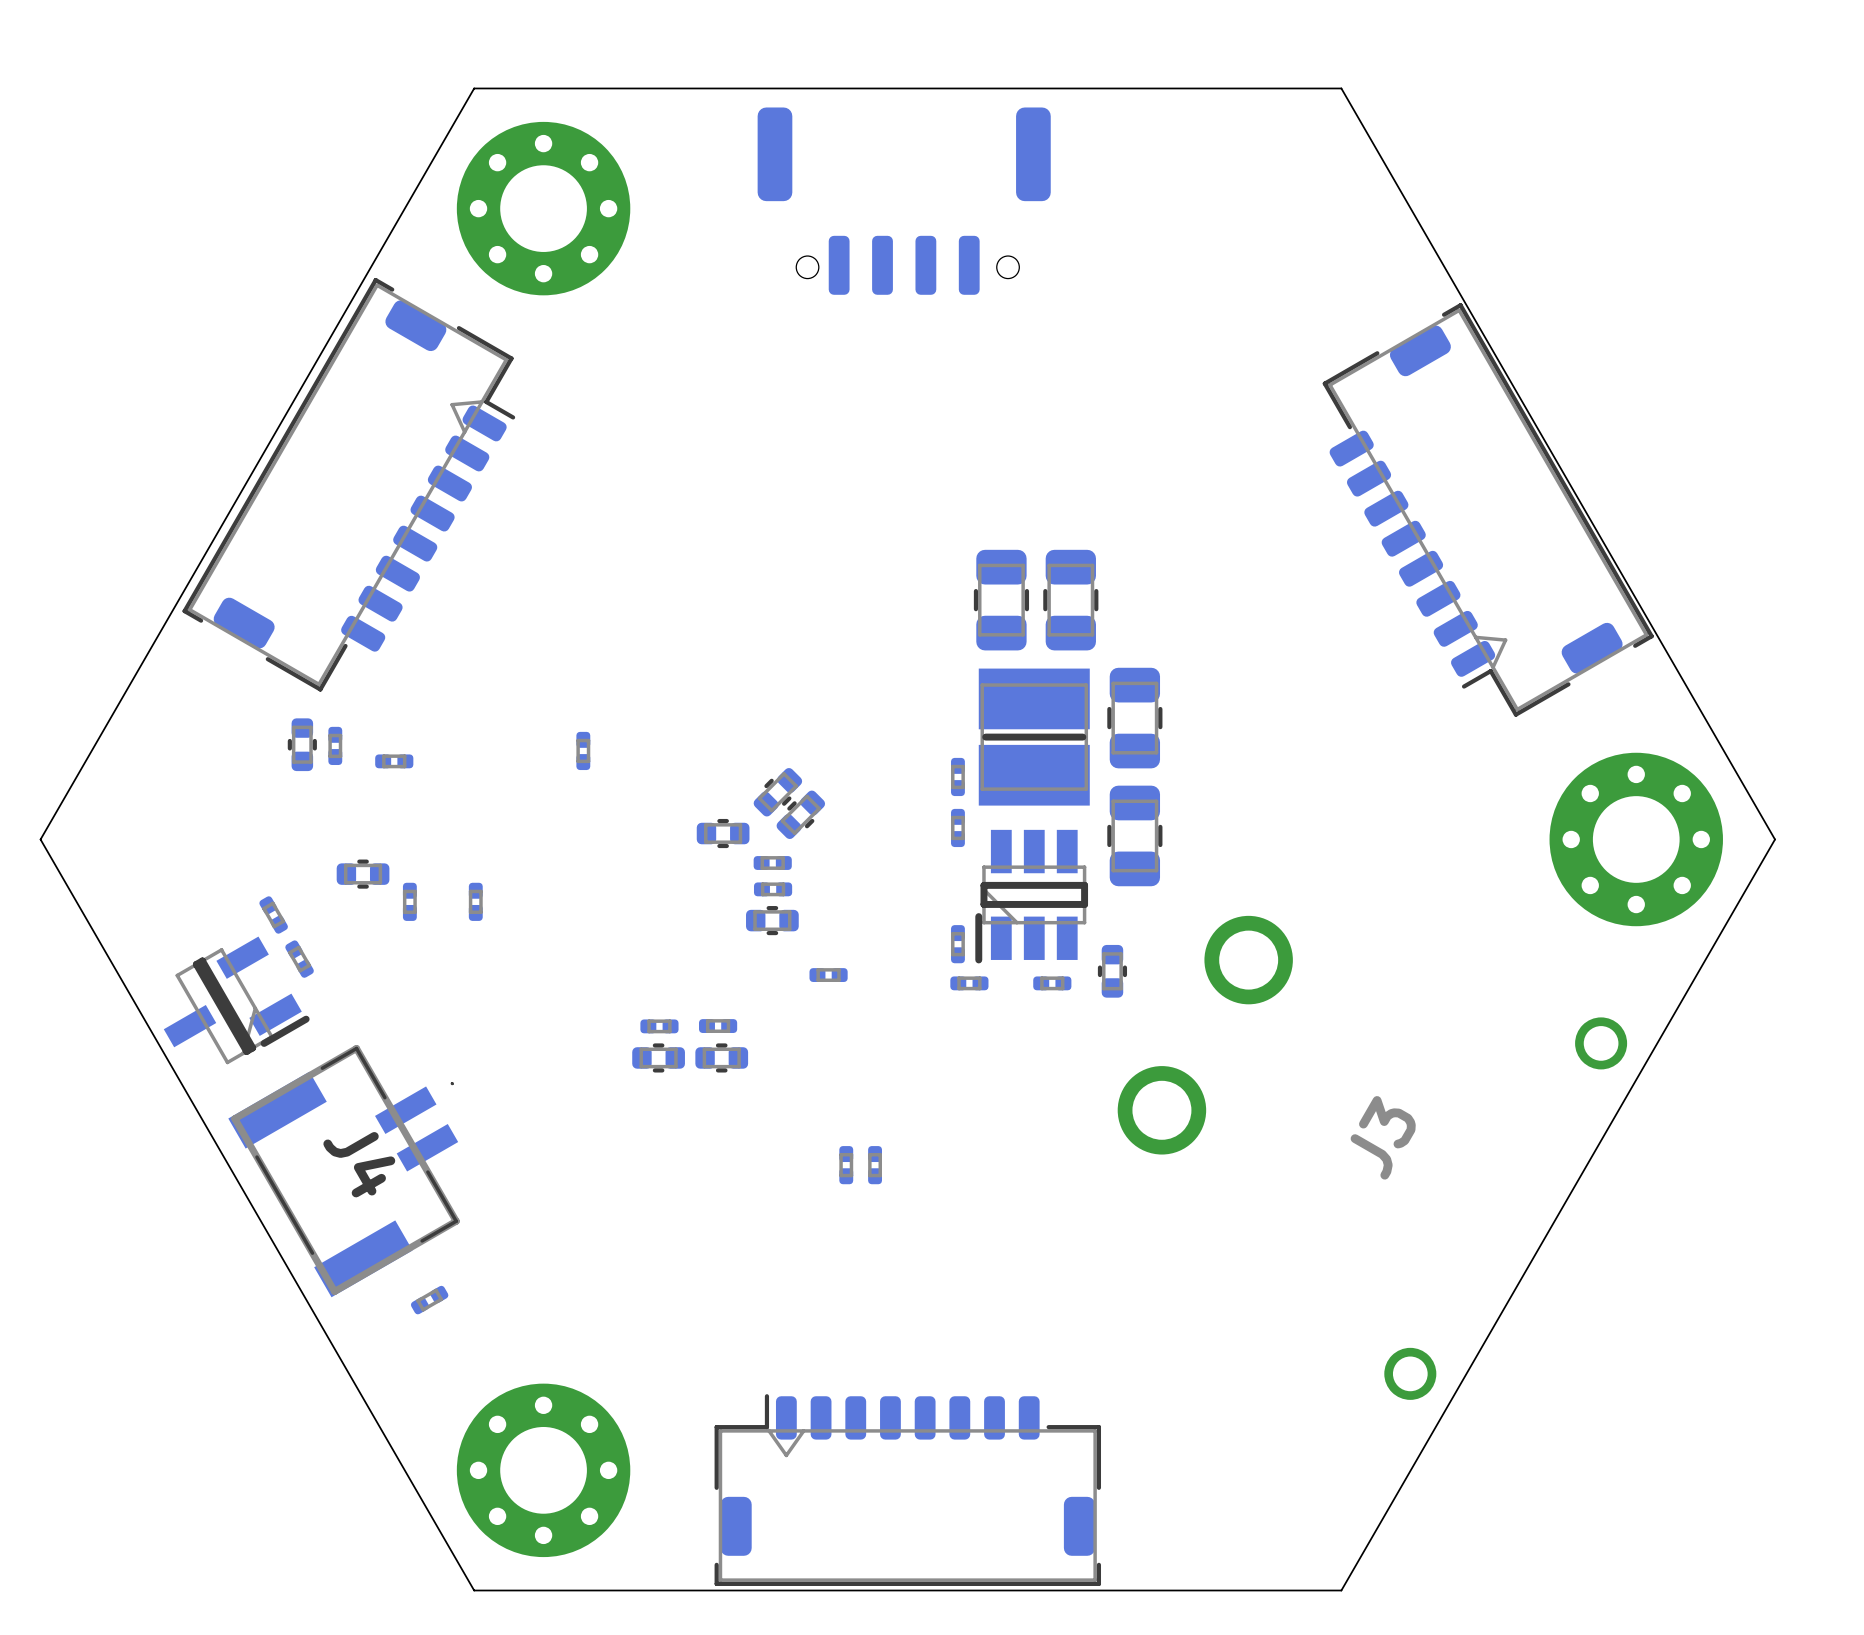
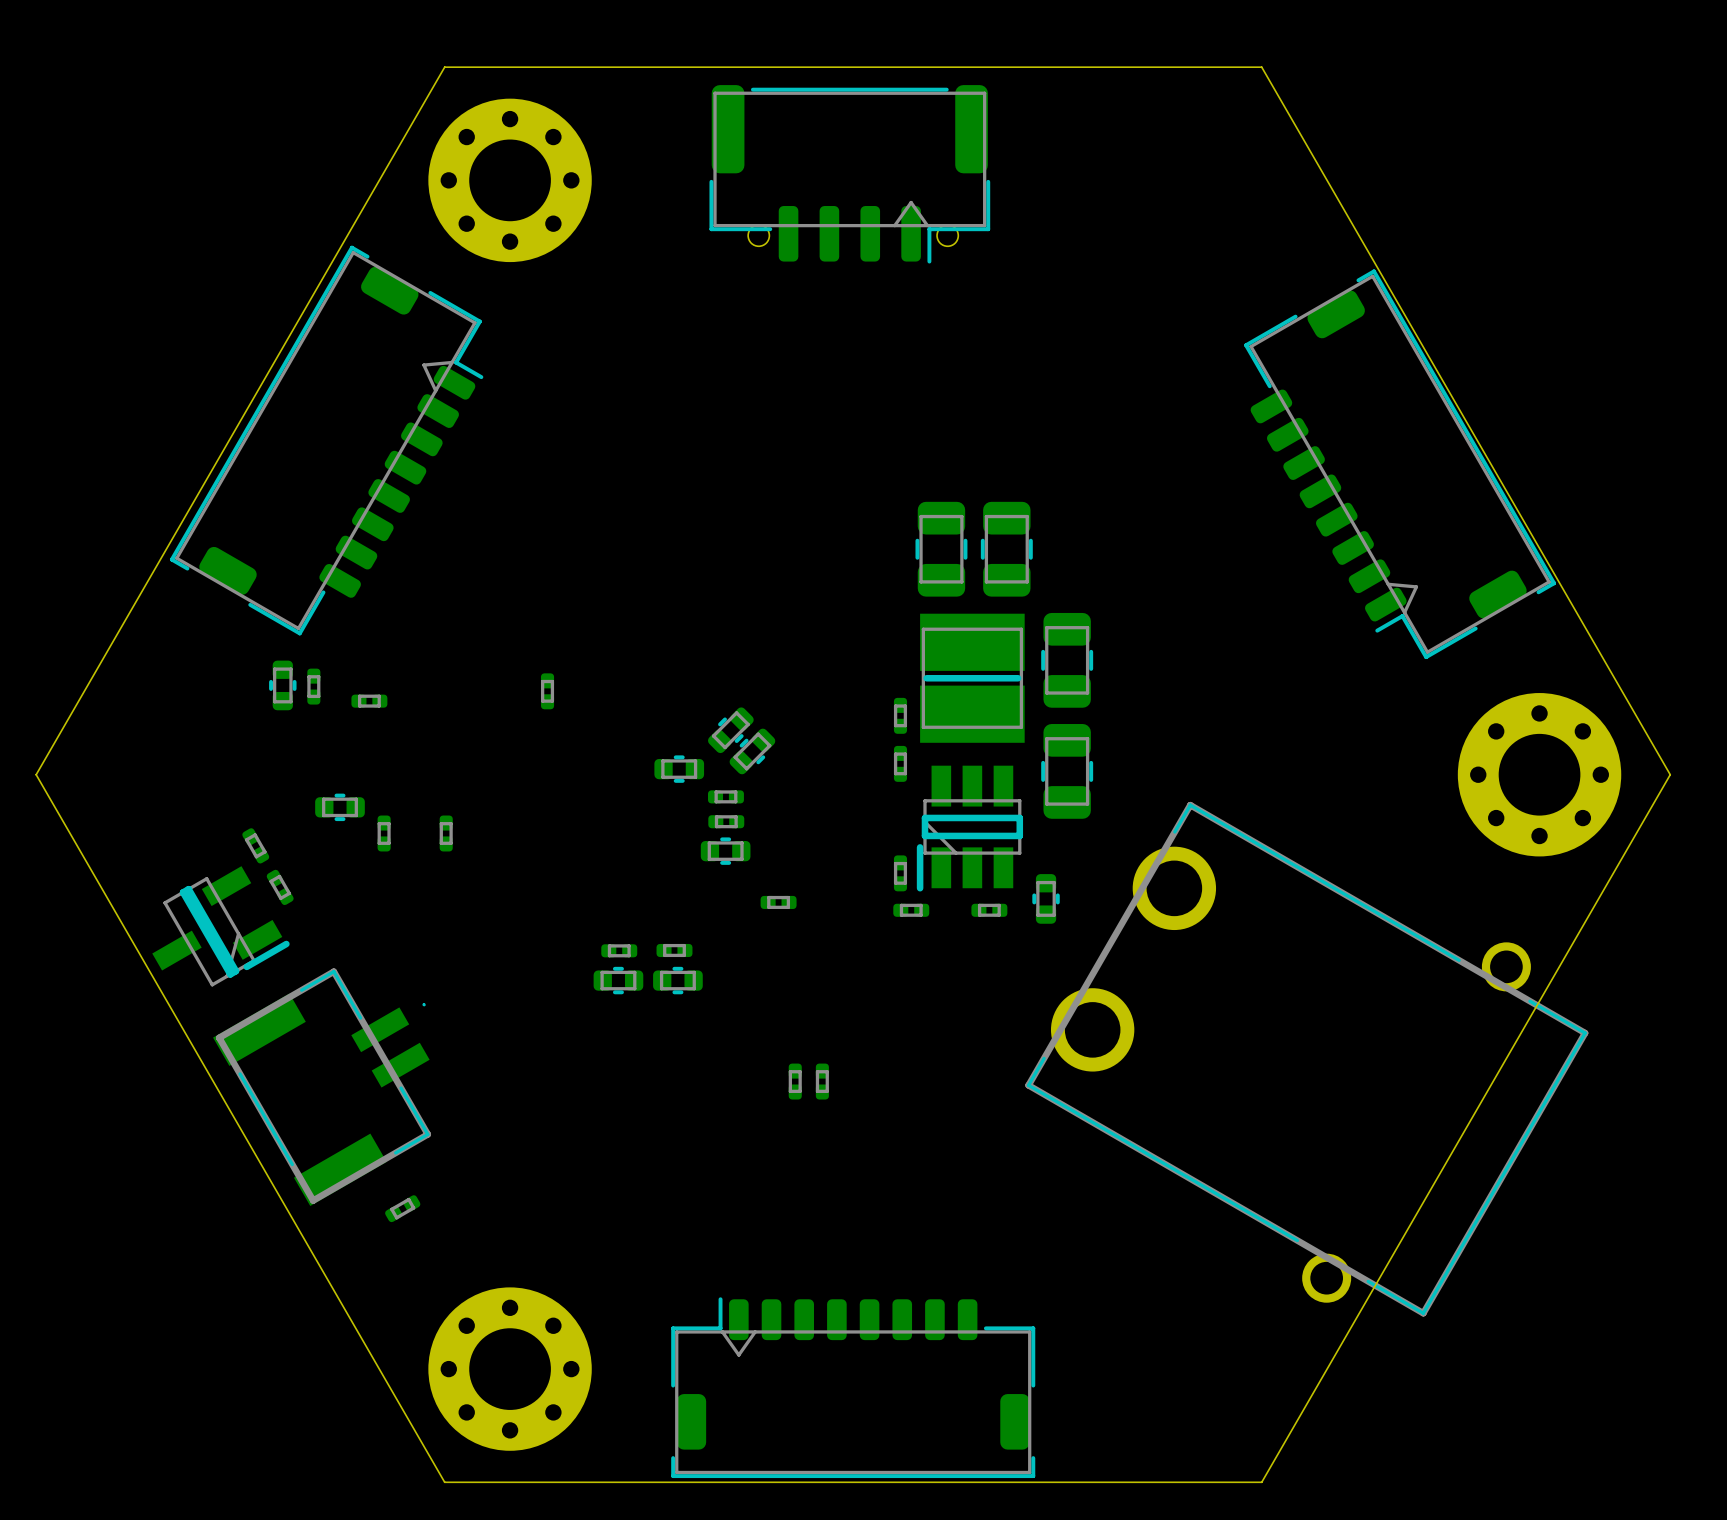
part footprint: [757, 107, 1051, 295] -> [709, 85, 991, 264]
part: none -> (1306, 1059)
J3: (1372, 1157) -> none
J4 name: J4 (359, 1164) -> none

